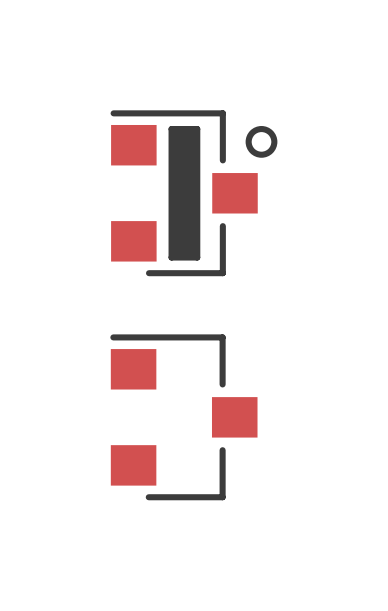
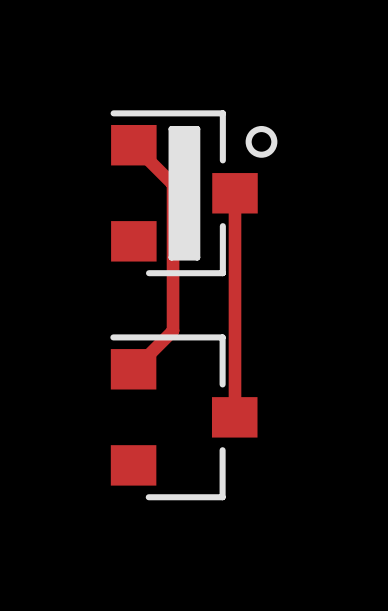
track: none -> (133, 145) (173, 184) (173, 330) (133, 370)
track: none -> (234, 193) (234, 418)

